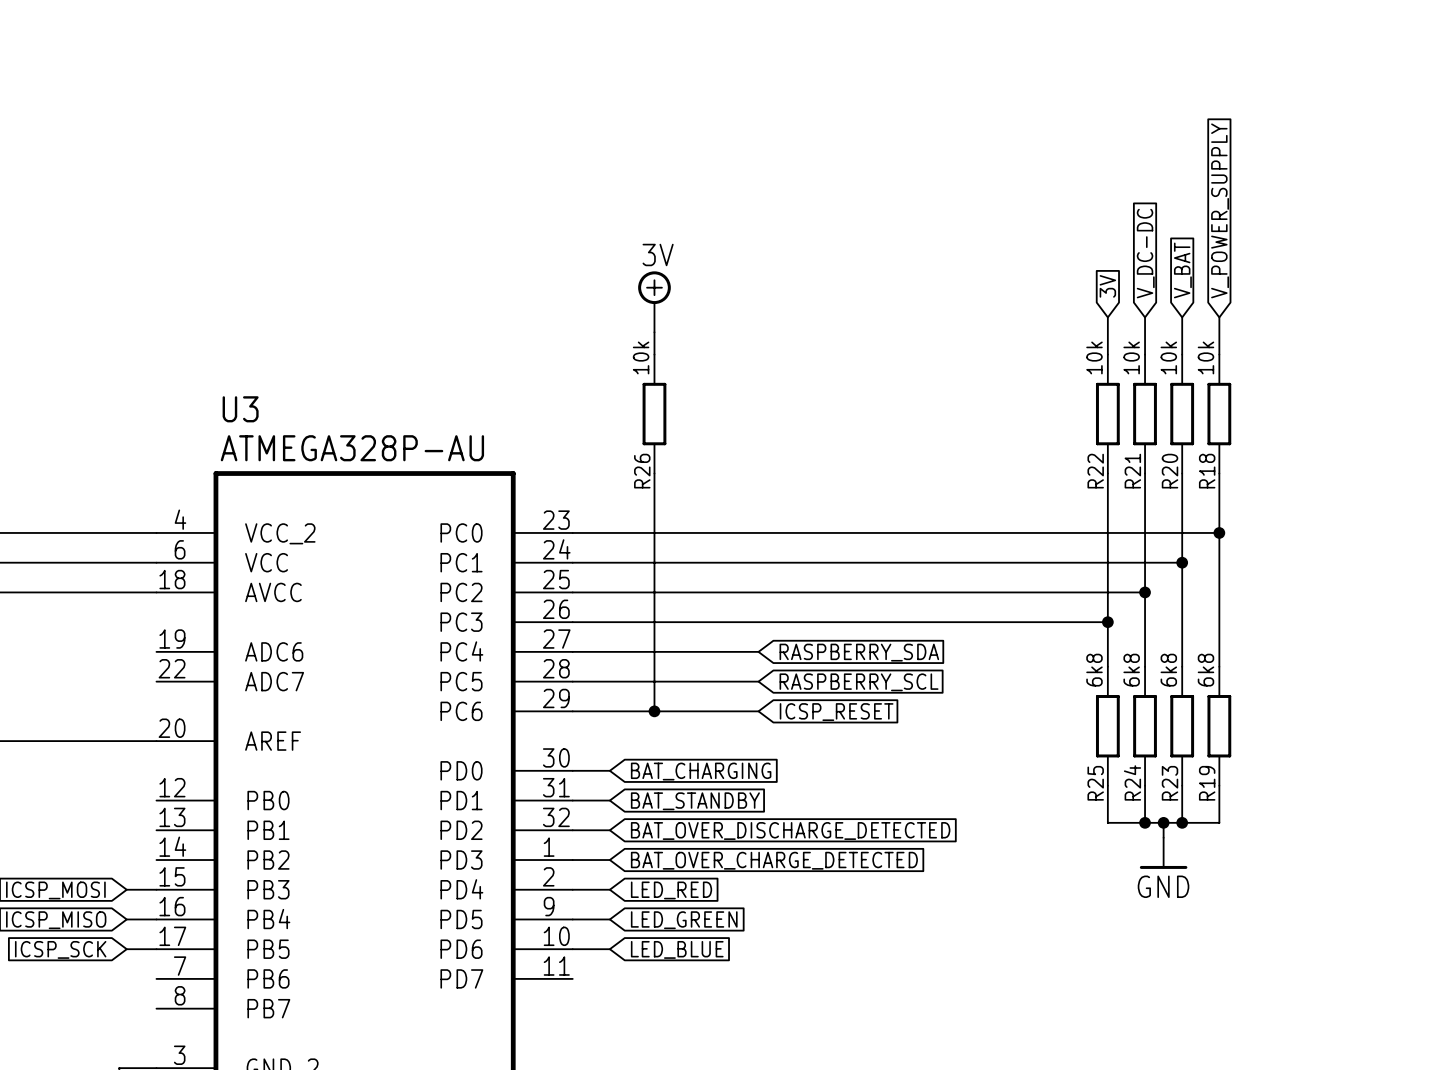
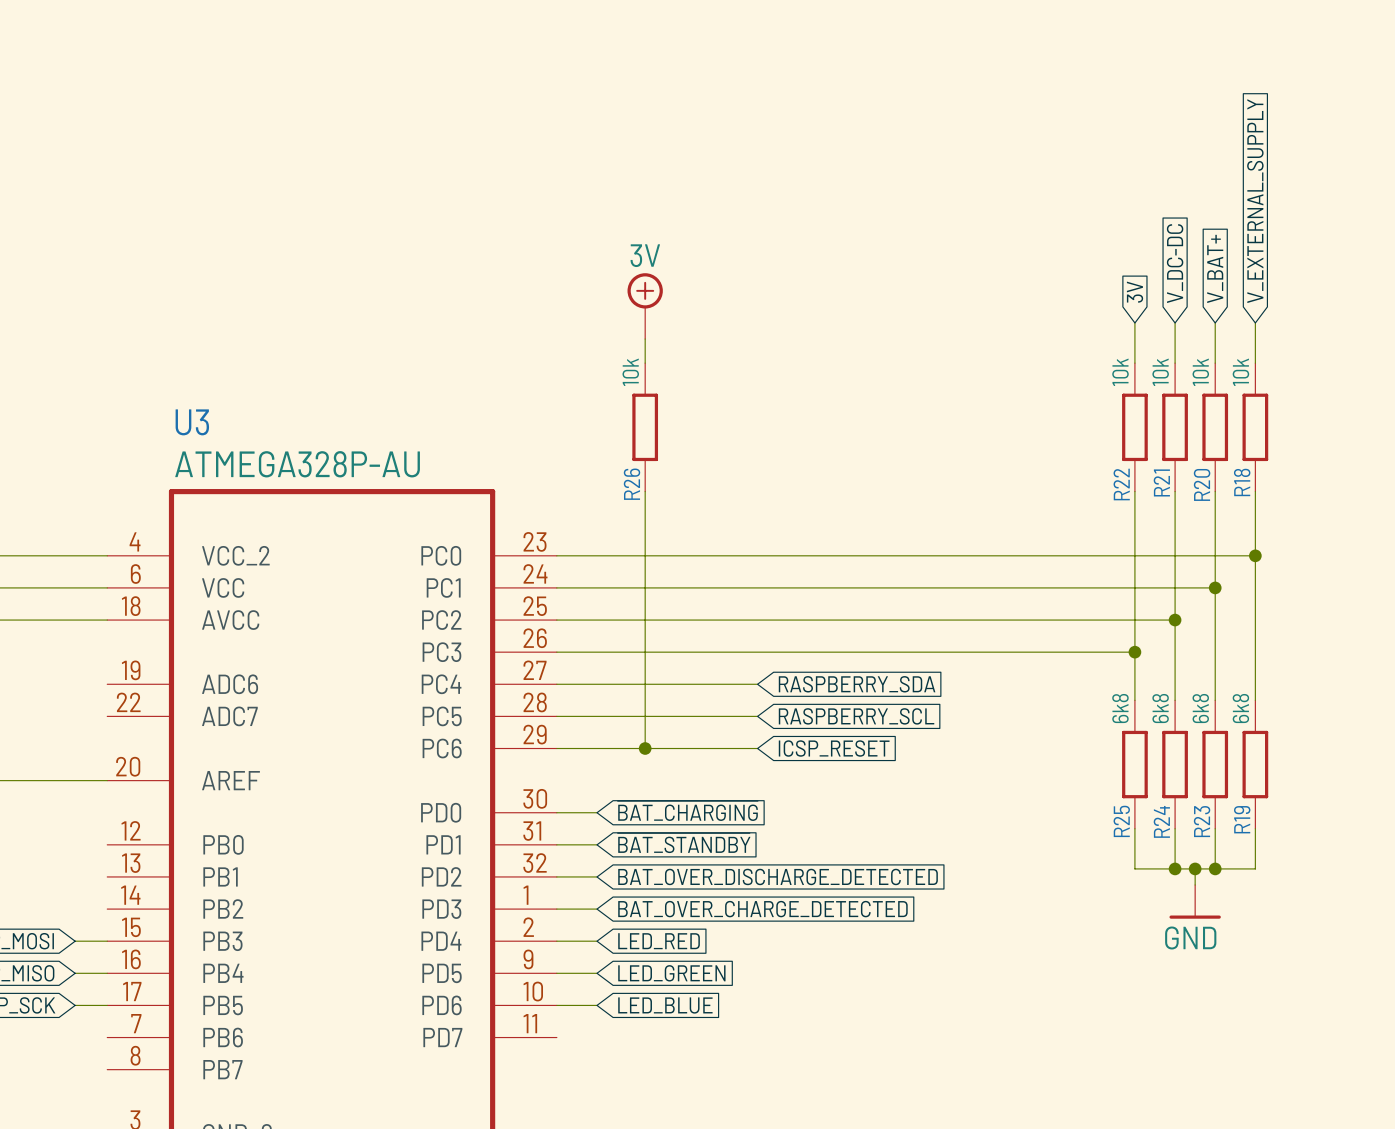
global label: V_POWER_SUPPLY (1220, 210) -> V_EXTERNAL_SUPPLY (1255, 201)
global label: V_BAT (1182, 270) -> V_BAT+ (1215, 268)
global label: BAT_CHARGING (701, 771) -> ~{BAT_CHARGING} (687, 810)
global label: BAT_STANDBY (695, 801) -> ~{BAT_STANDBY} (684, 843)

